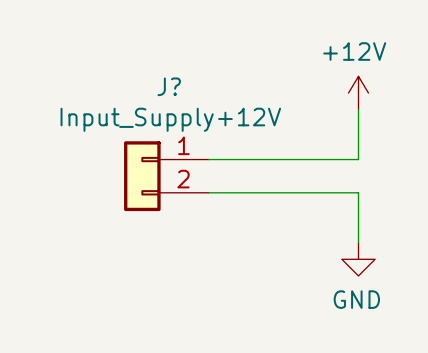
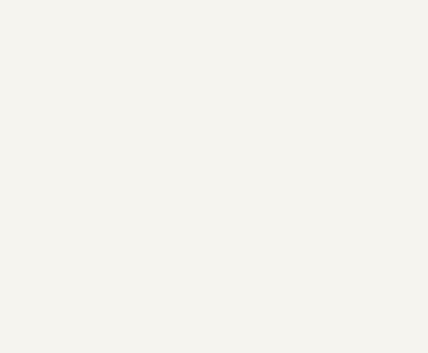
power symbol: +12V (358, 93) -> none
wire: (358, 109) (358, 159) (208, 159) -> none
J?: Input_Supply+12V (166, 176) -> none
wire: (208, 192) (358, 192) (358, 242) -> none
power symbol: GND (358, 259) -> none

